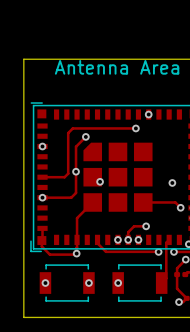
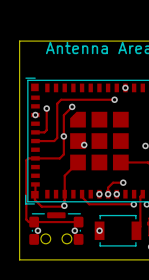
track: none -> (46, 108) (46, 130) (44, 132) (35, 132)
track: none -> (35, 158) (26, 160) (26, 219) (28, 222) (78, 222)
via position: (42, 197) -> (46, 108)
part footprint: [39, 264, 95, 302] -> [29, 212, 84, 245]

